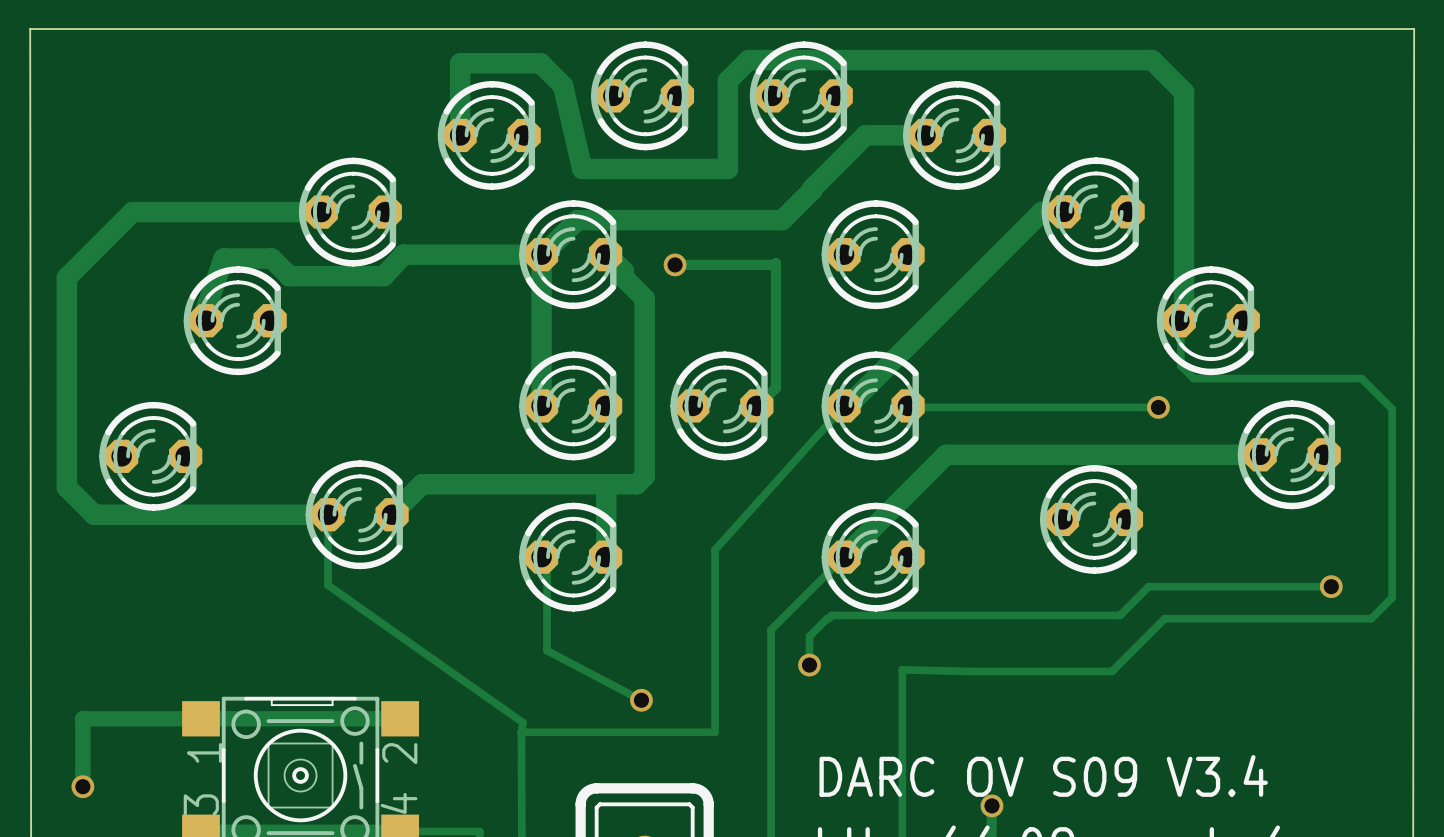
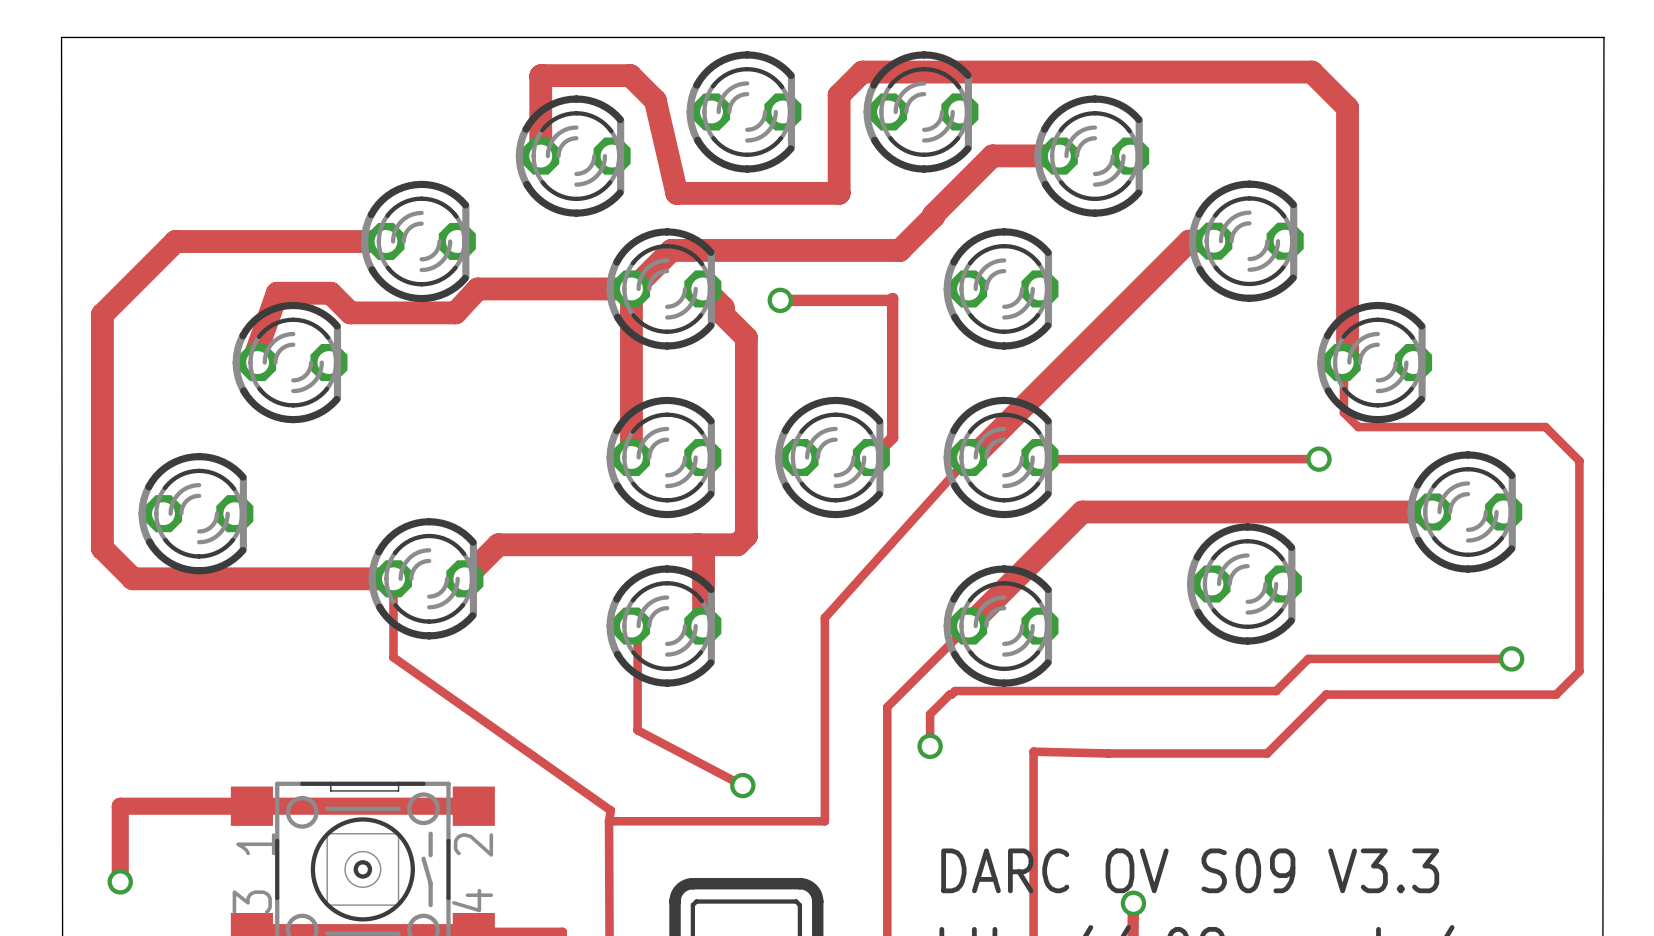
text: DARC OV S09 V3.4 (1043, 775) -> DARC OV S09 V3.3 (1190, 870)

